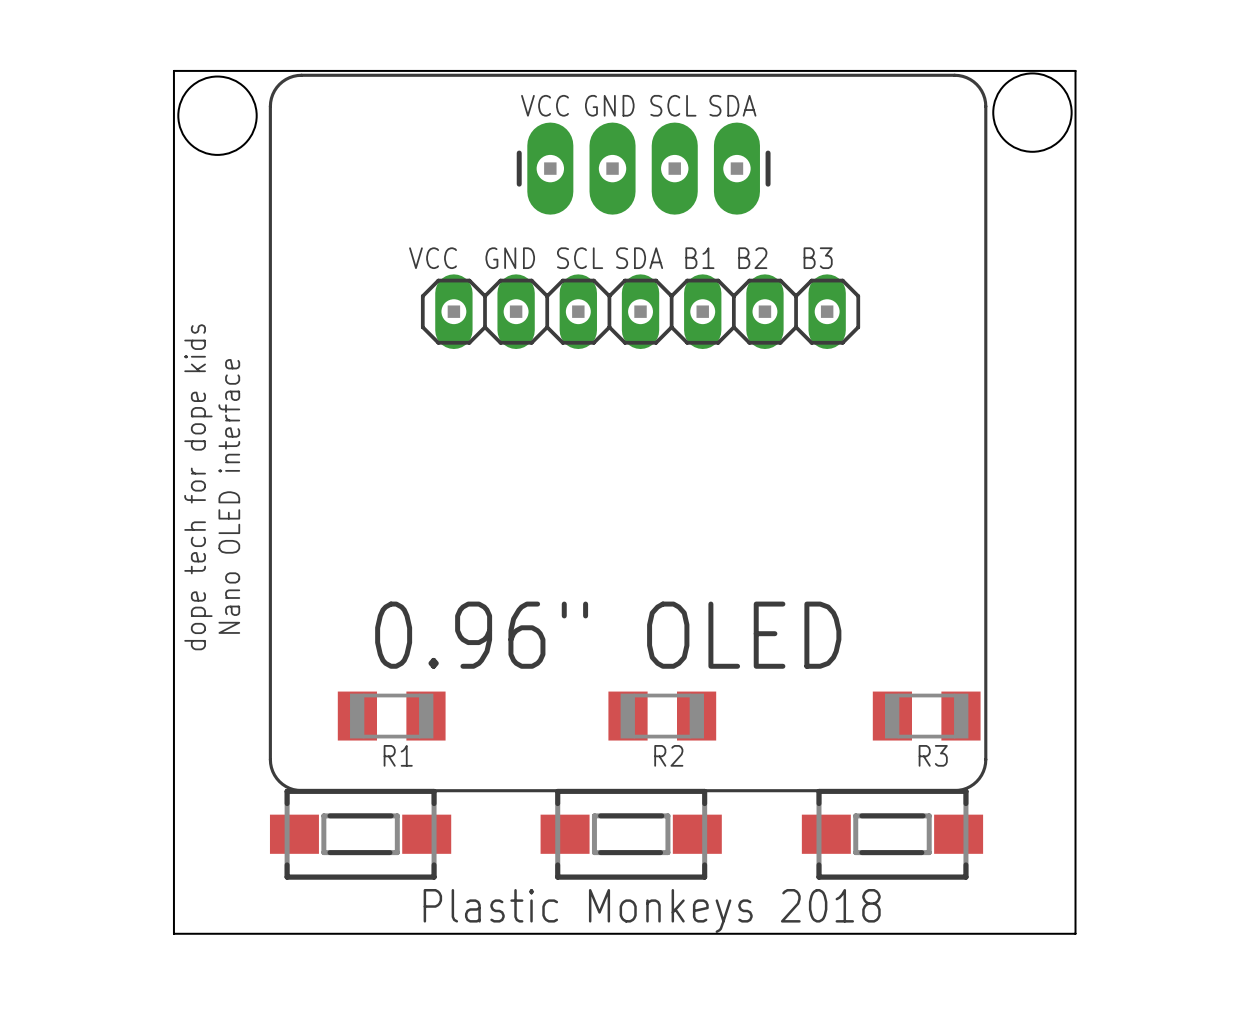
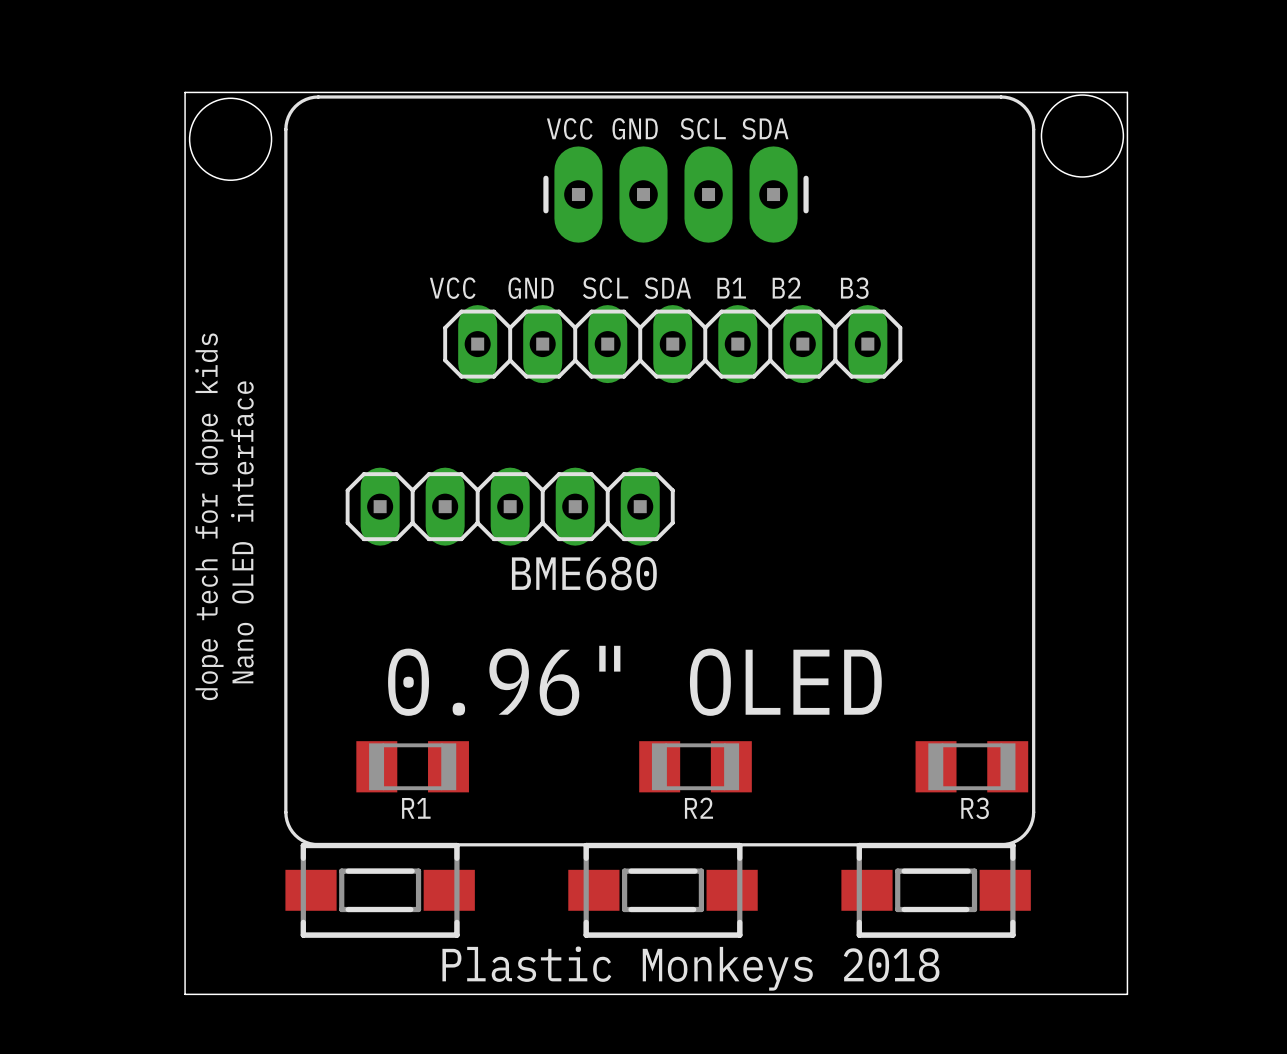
BME680: none -> (510, 506)

